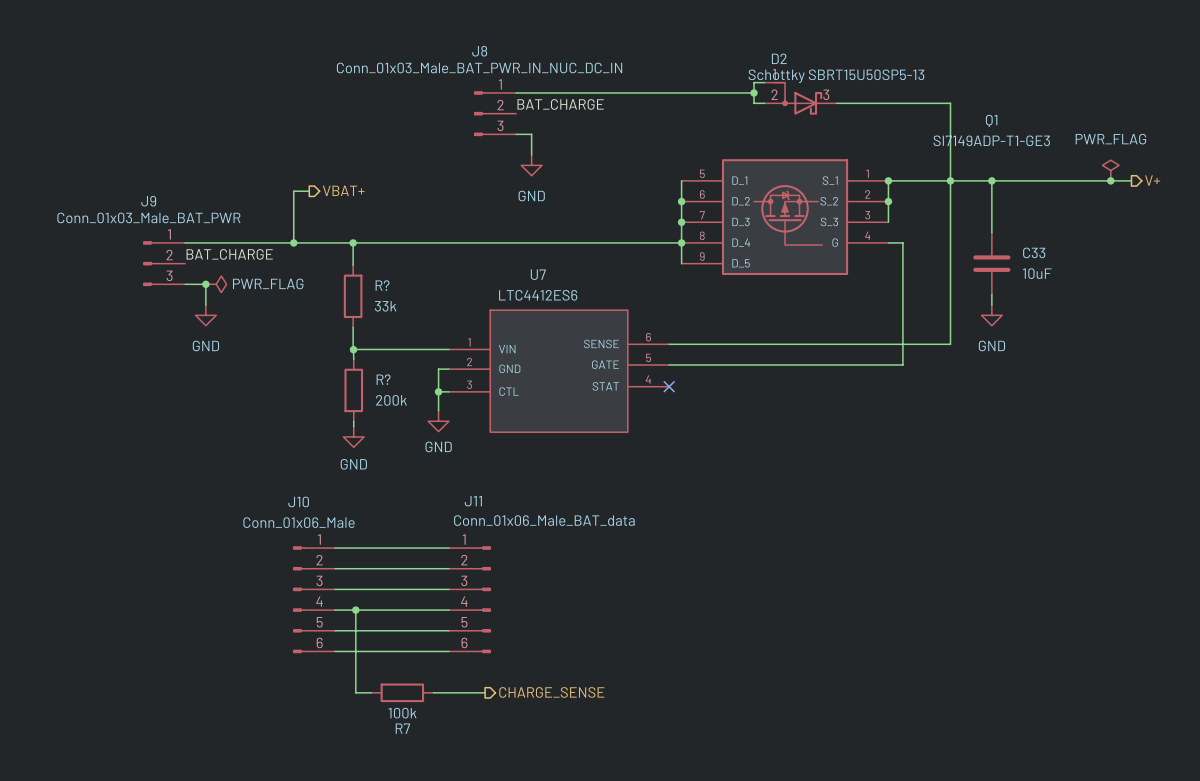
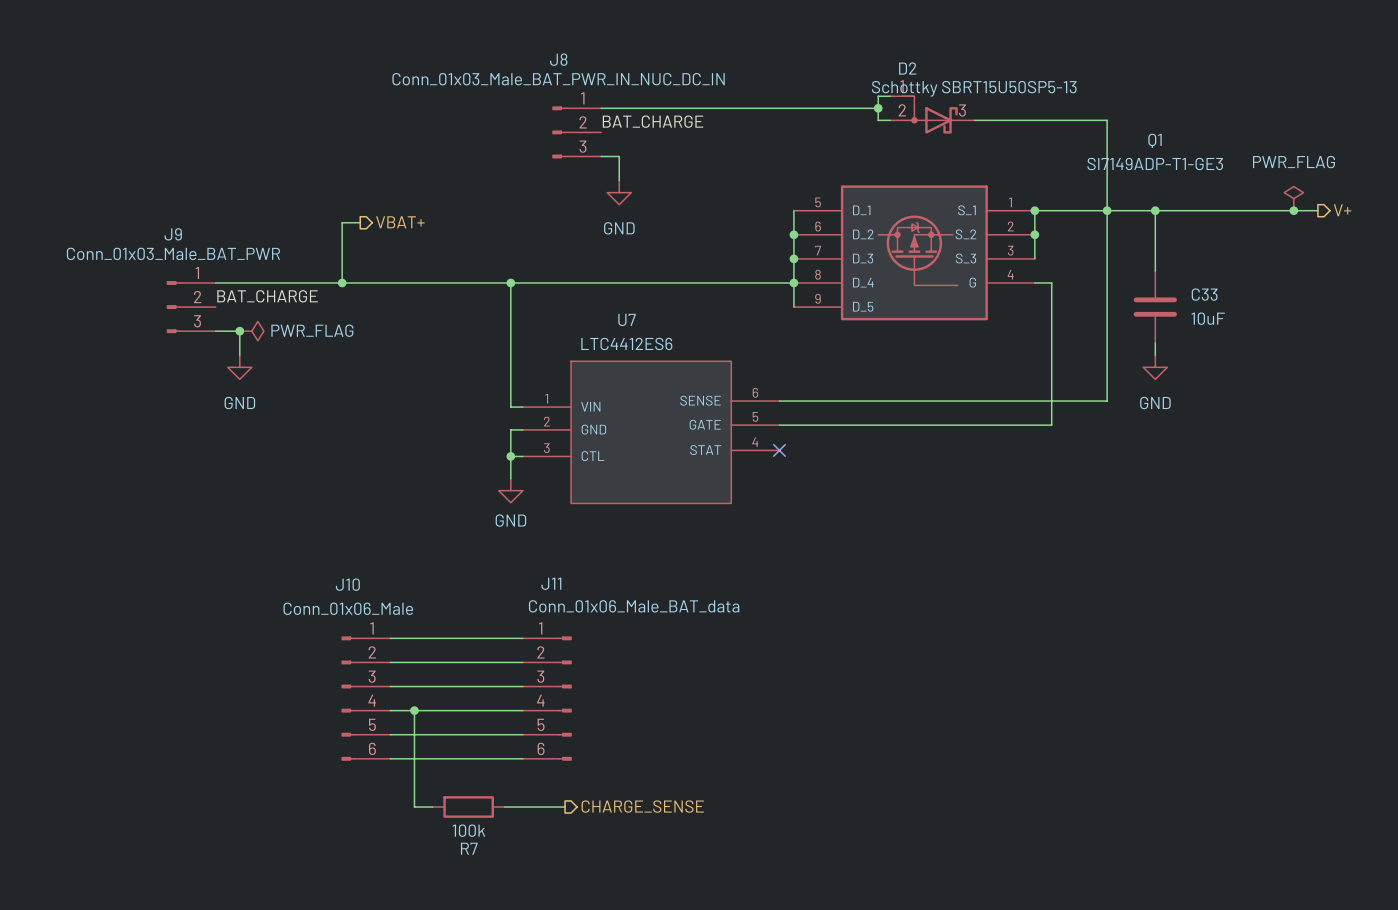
wire: (353, 242) (353, 265) -> none
junction: (353, 242) -> none
junction: none -> (510, 282)
R?: 33k (353, 296) -> none
wire: (353, 327) (353, 349) (438, 349) -> (510, 282) (510, 407)
wire: (353, 349) (353, 359) -> none
junction: (353, 349) -> none
R?: 200k (353, 390) -> none
wire: (353, 421) (353, 426) -> none
power symbol: GND (353, 436) -> none

